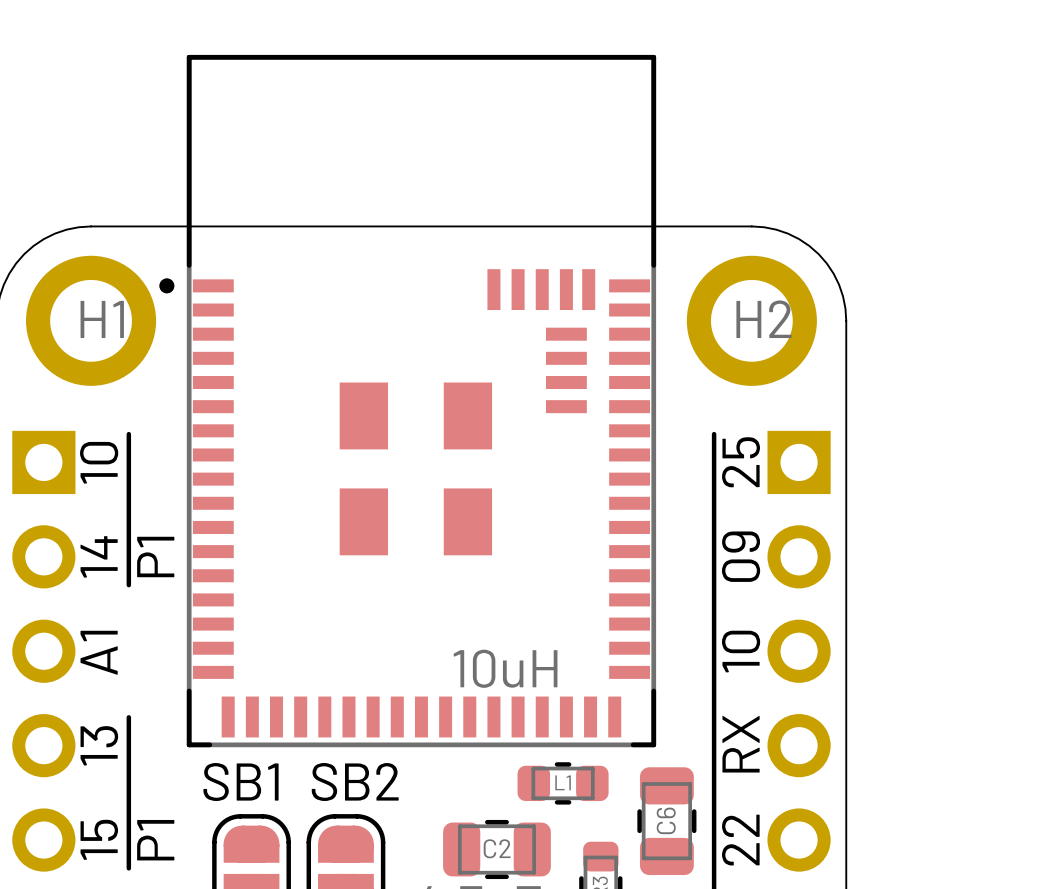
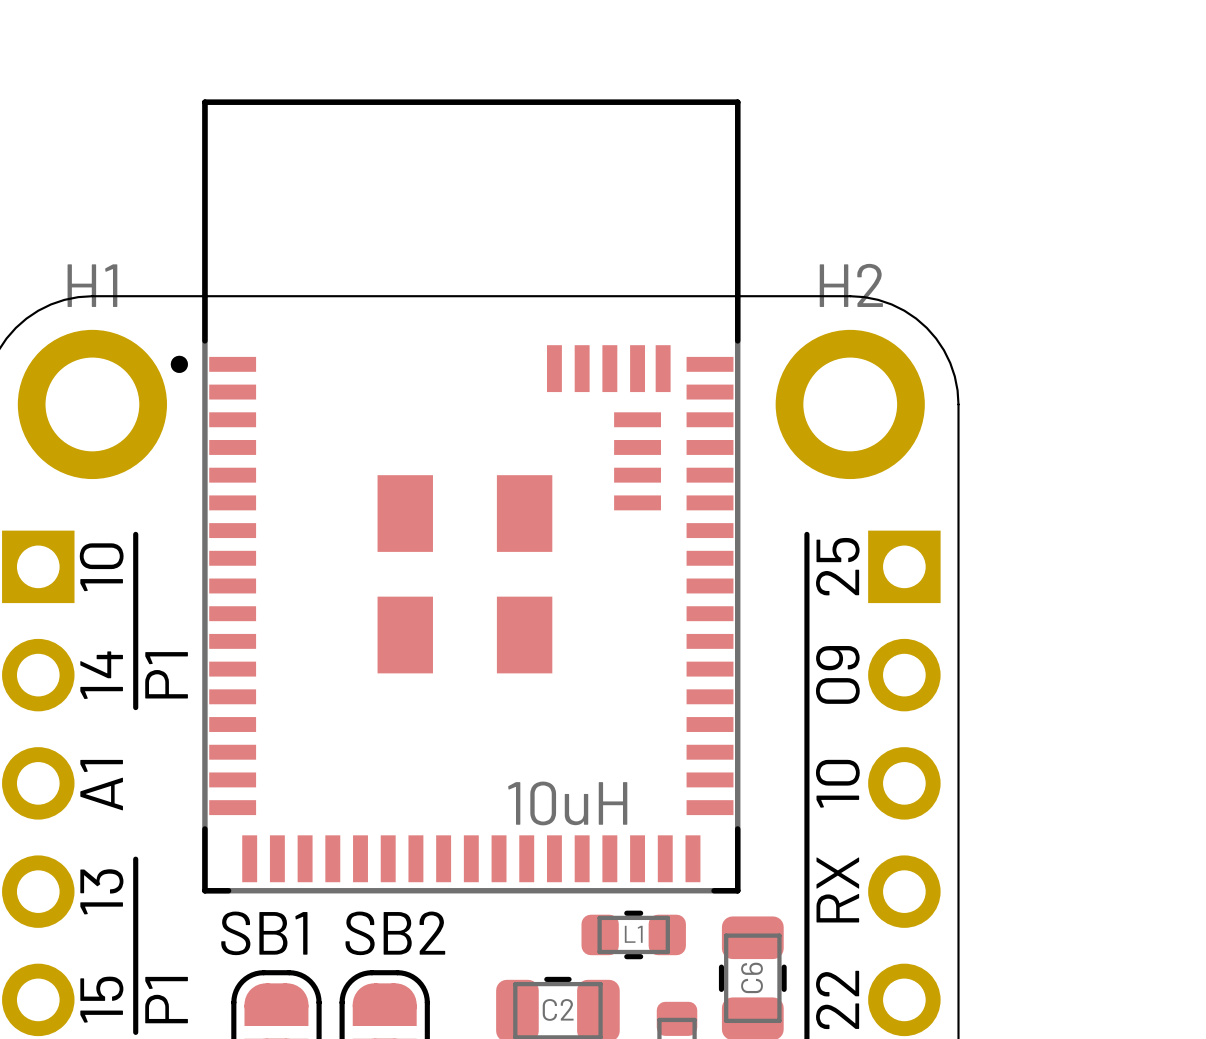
H1 name position: H1 (102, 319) -> H1 (92, 285)
H2 name position: H2 (763, 319) -> H2 (851, 285)

